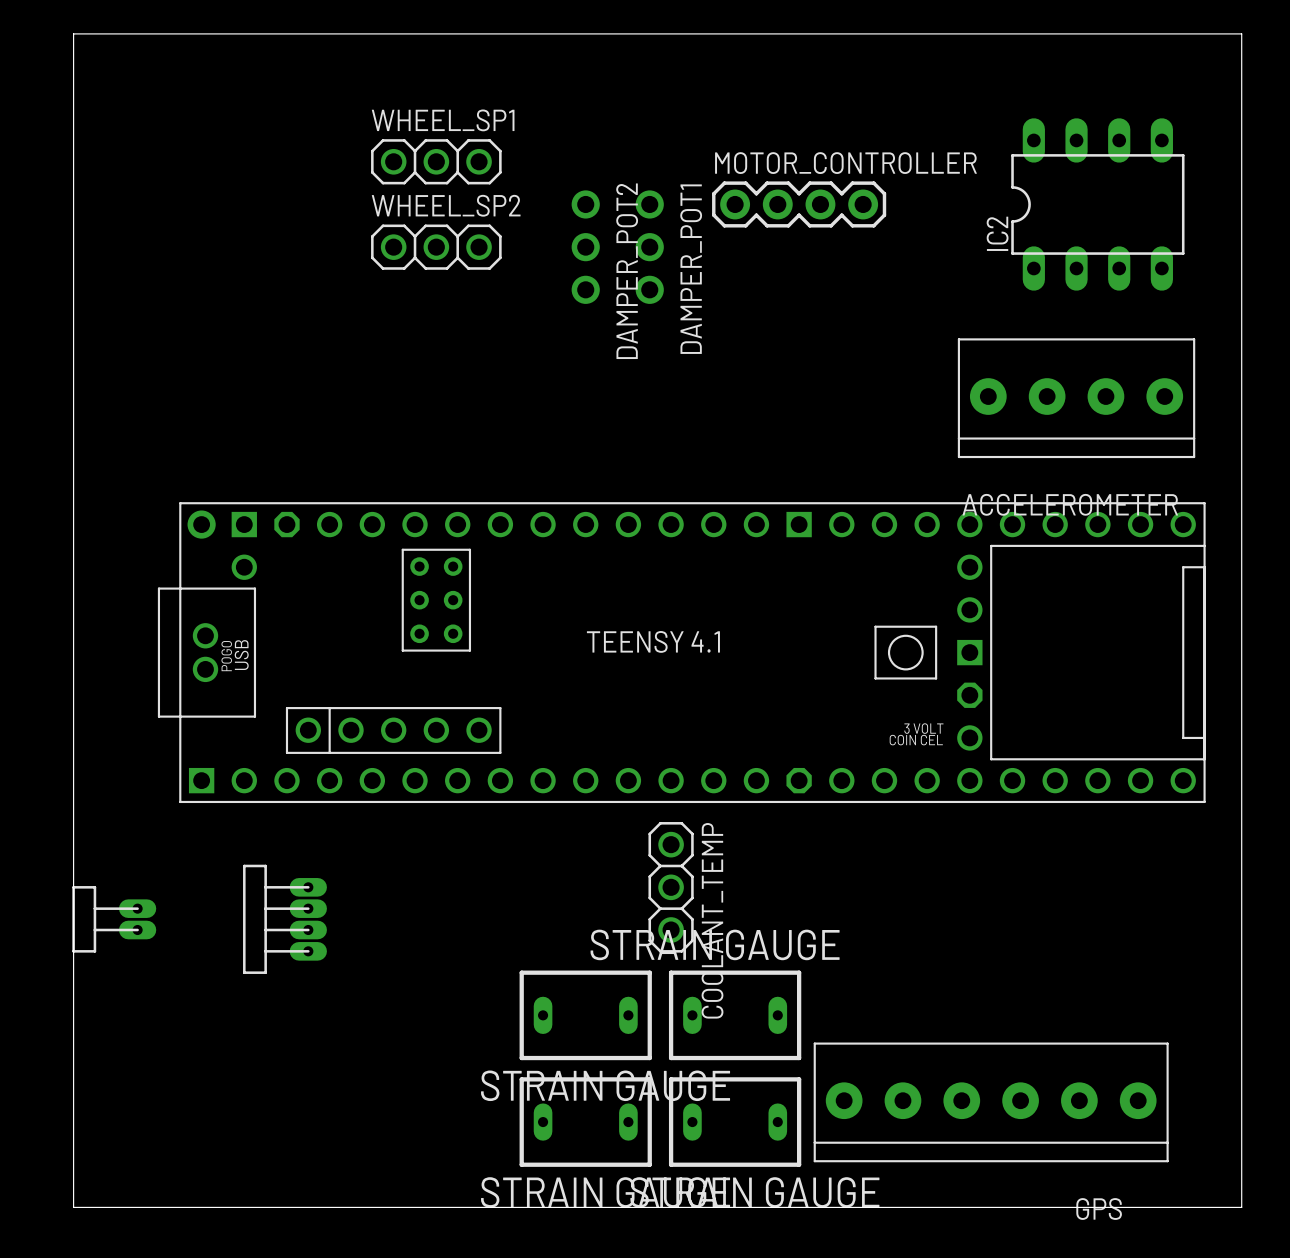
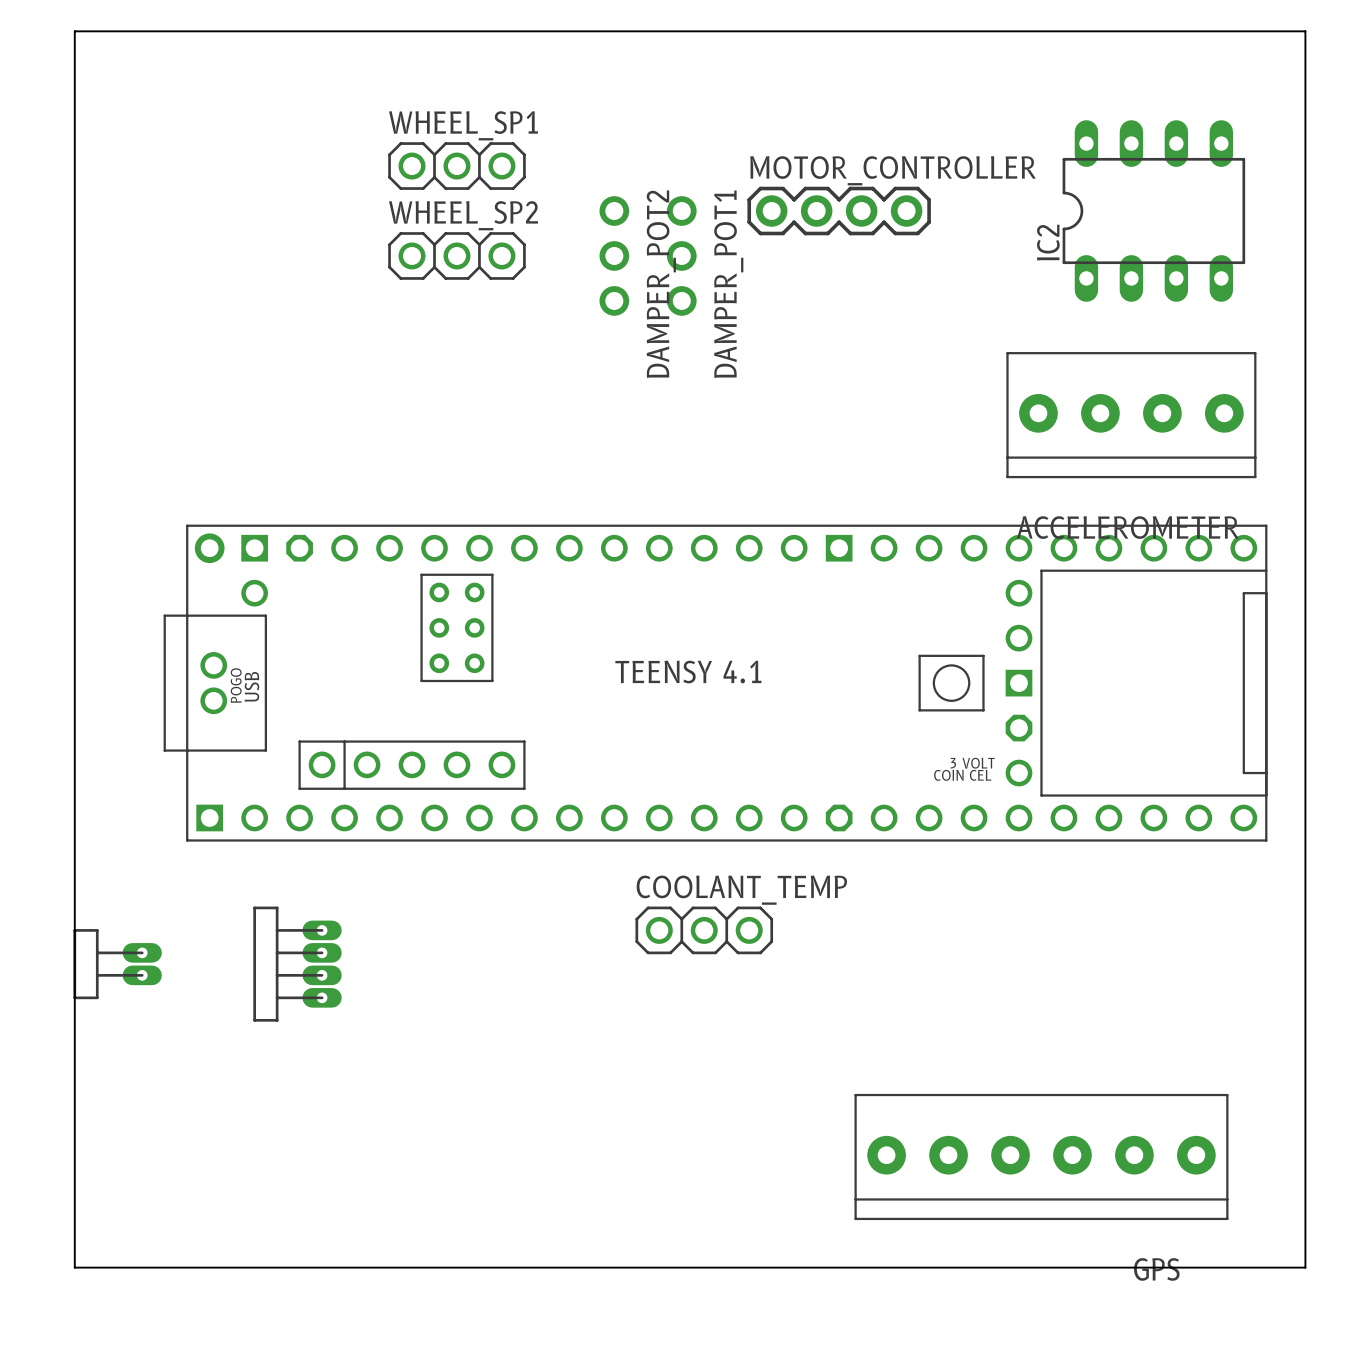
COOLANT_TEMP rotation: 0° (671, 887) -> 90° clockwise (704, 930)
COOLANT_TEMP name position: COOLANT_TEMP (712, 920) -> COOLANT_TEMP (741, 890)
part: (585, 1015) -> none
part: (735, 1015) -> none
part: (585, 1122) -> none
part: (735, 1122) -> none

